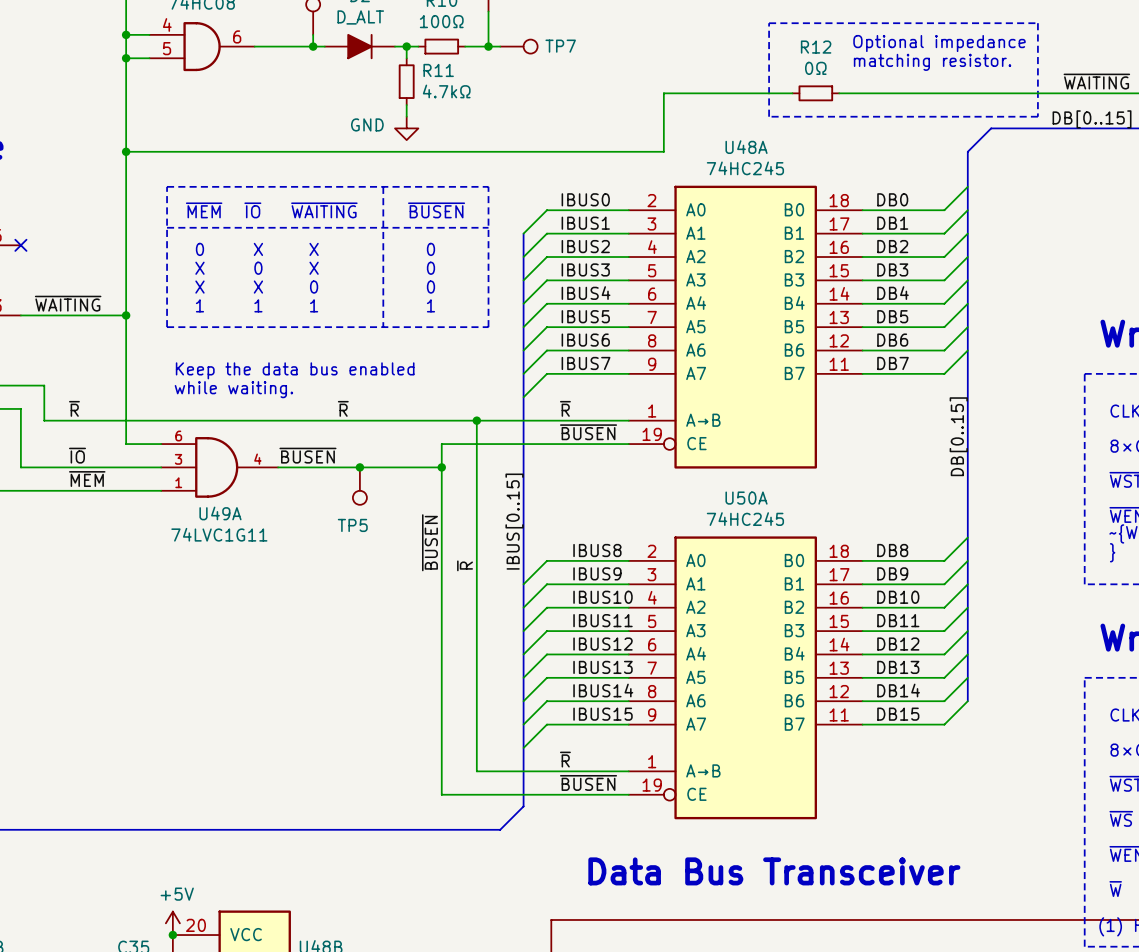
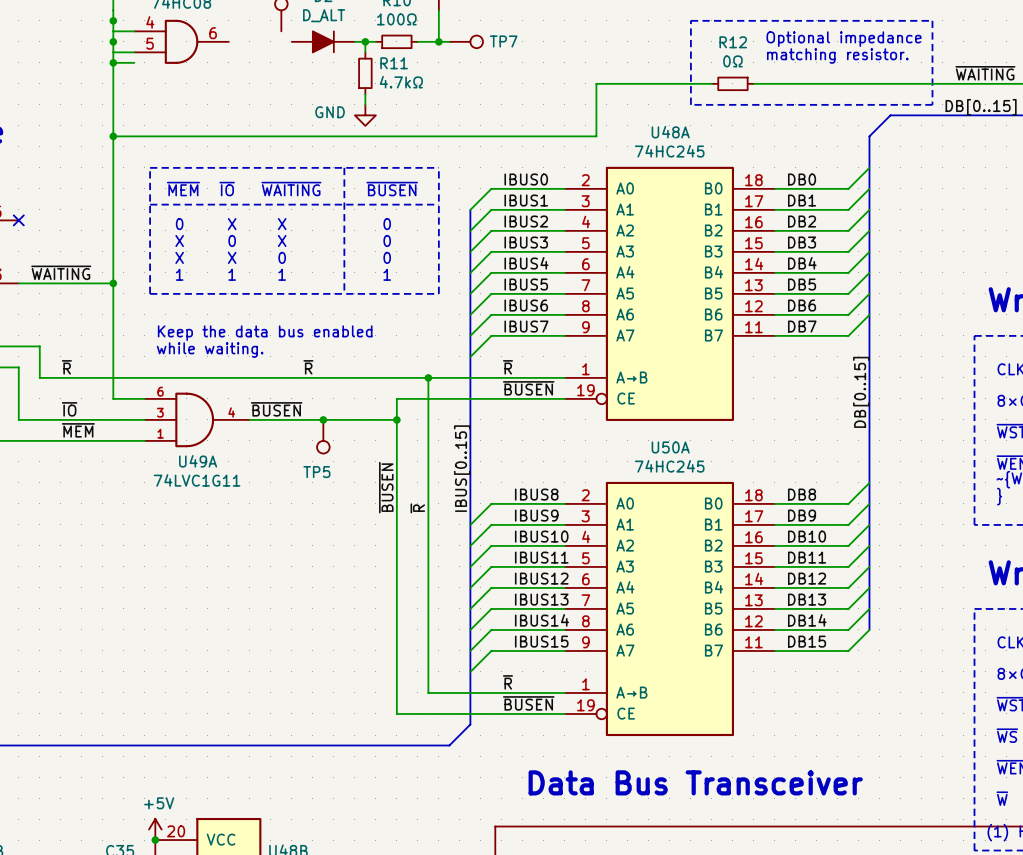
junction: none -> (113, 20)
junction: (126, 34) -> none
wire: (313, 34) (313, 46) -> none
junction: none -> (113, 41)
wire: (254, 46) (324, 46) -> none
junction: (313, 46) -> none
junction: (126, 58) -> none
wire: none -> (113, 62) (134, 62)
junction: none -> (113, 62)

